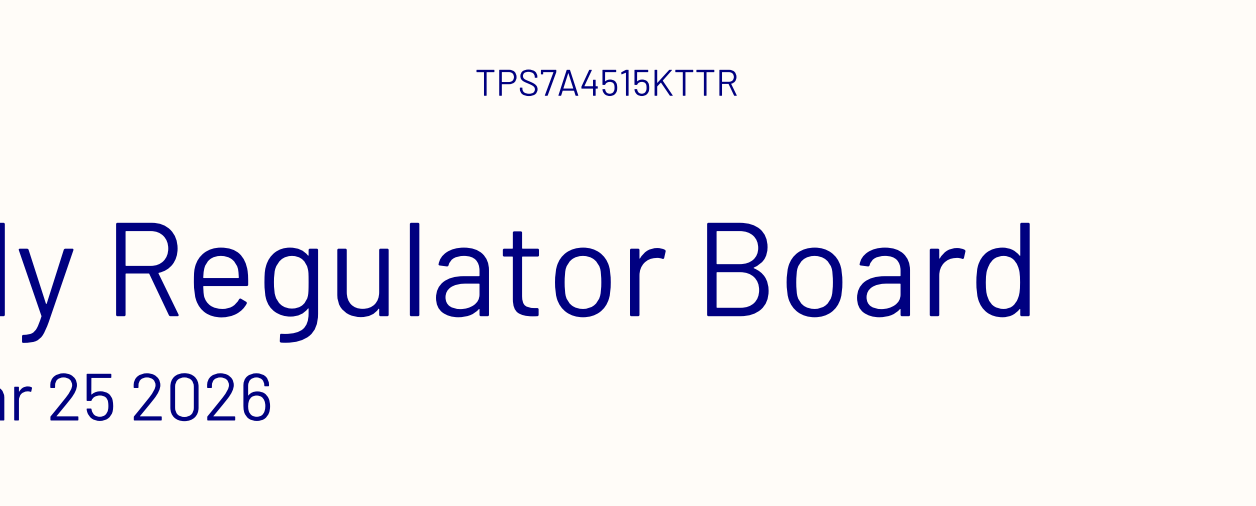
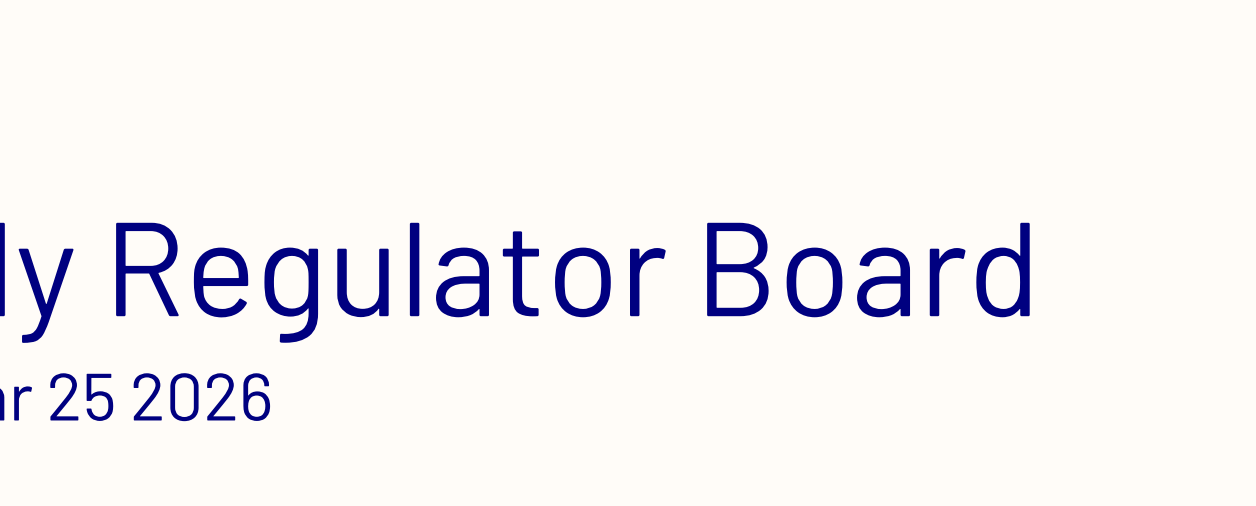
text: TPS7A4515KTTR (606, 82) -> none

